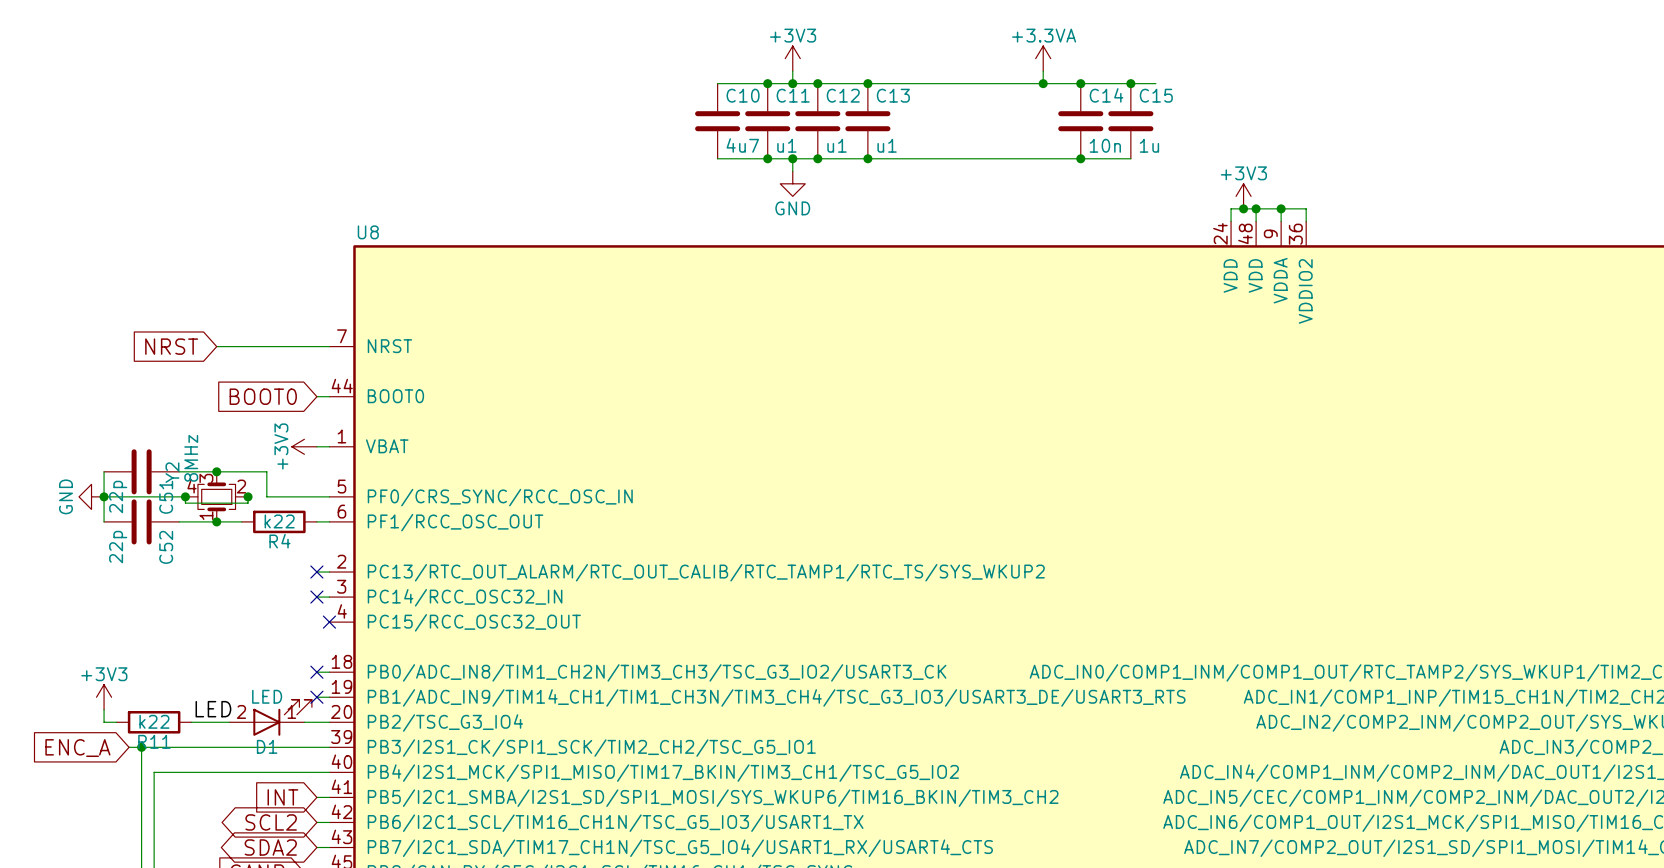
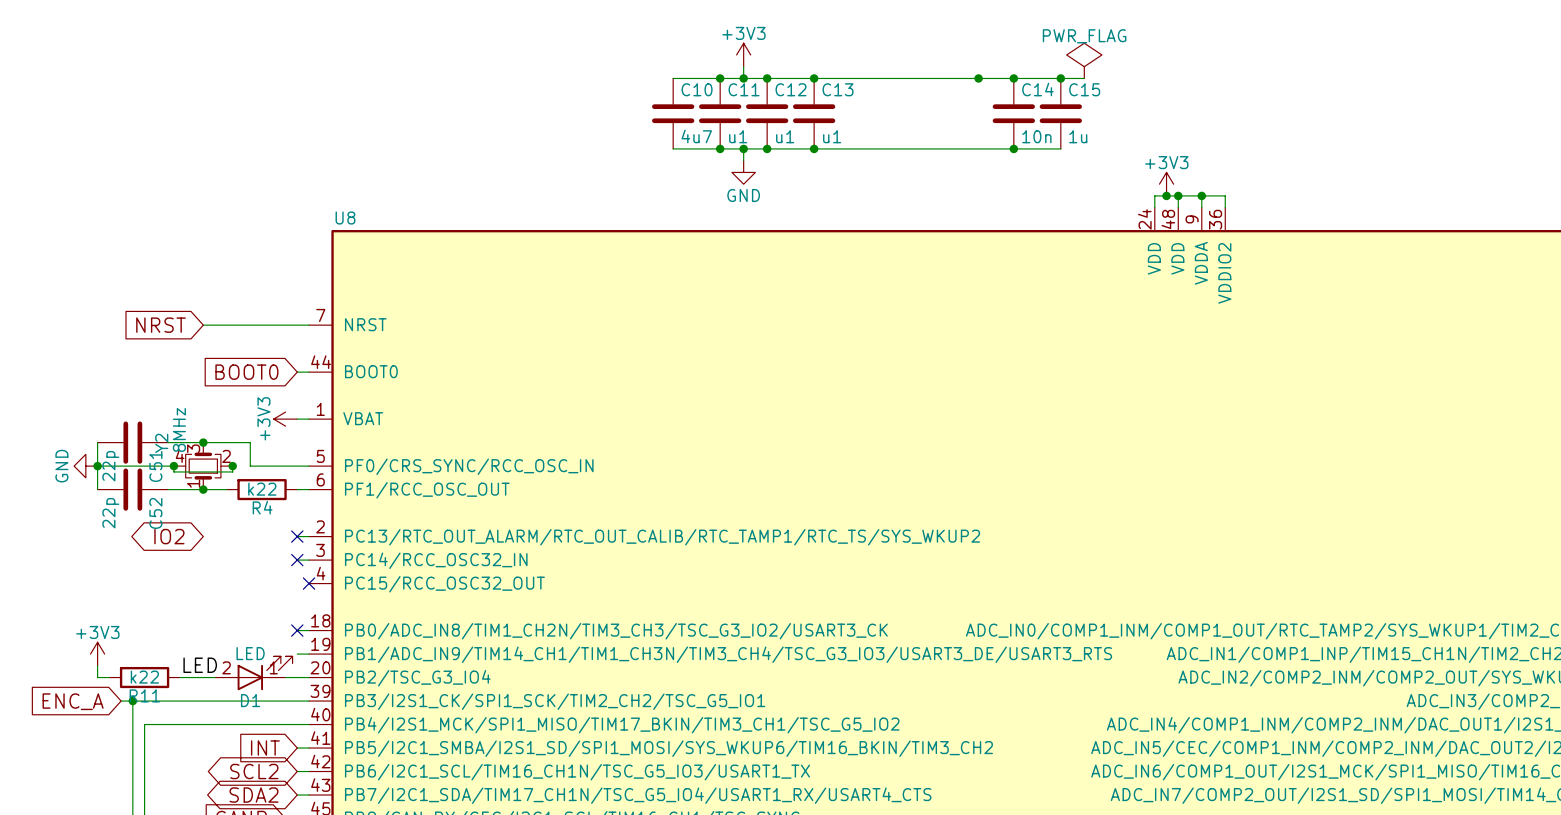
power symbol: +3.3VA (1043, 58) -> none
power symbol: none -> PWR_FLAG (1084, 60)
wire: (1043, 71) (1043, 83) -> none
global label: none -> IO2 (169, 536)
no-connect mark: (316, 697) -> none

